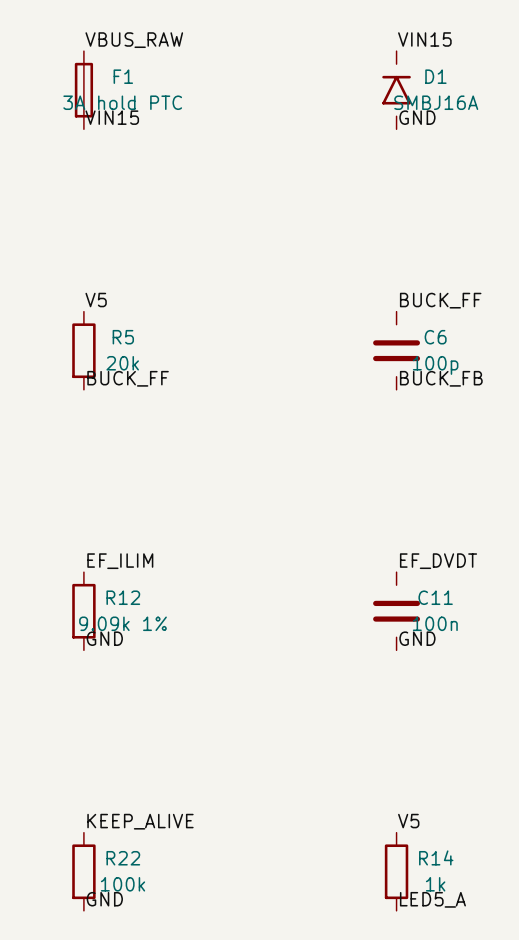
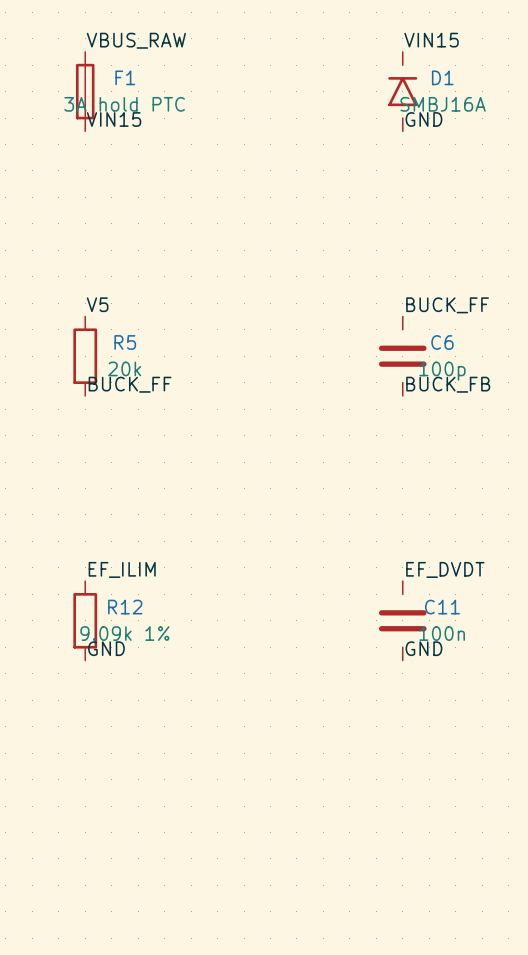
label: KEEP_ALIVE (140, 821) -> none
label: V5 (408, 821) -> none
R22: 100k (83, 871) -> none
R14: 1k (396, 871) -> none
label: GND (104, 899) -> none
label: LED5_A (432, 899) -> none

